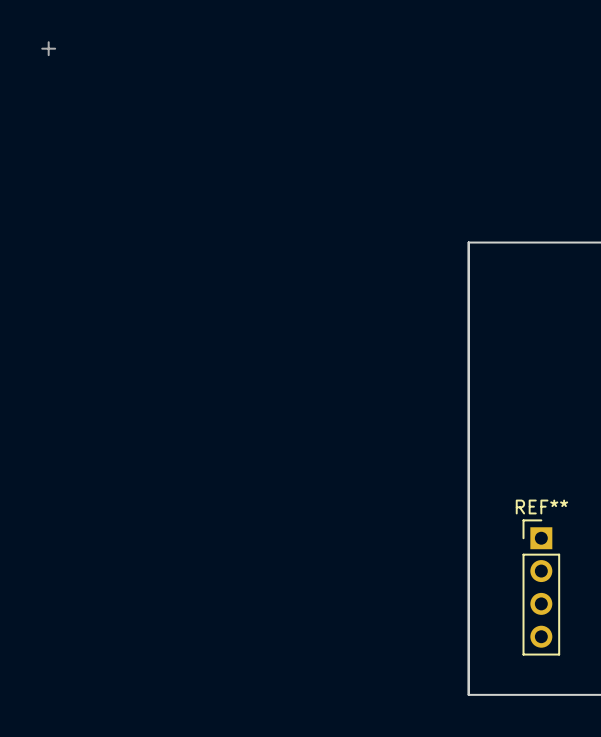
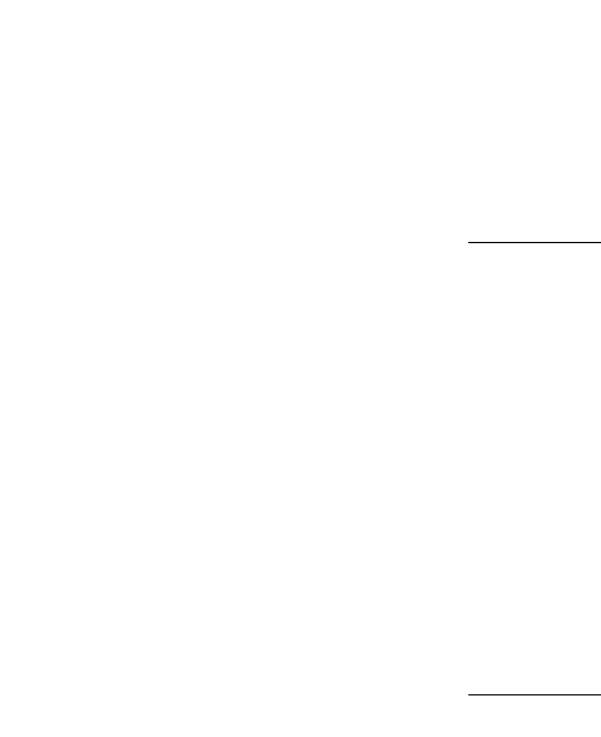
line: (48, 42) (48, 55) -> none
line: (42, 48) (55, 48) -> none
board edge: (468, 242) (468, 694) (468, 242) -> none
REF**: (541, 587) -> none

